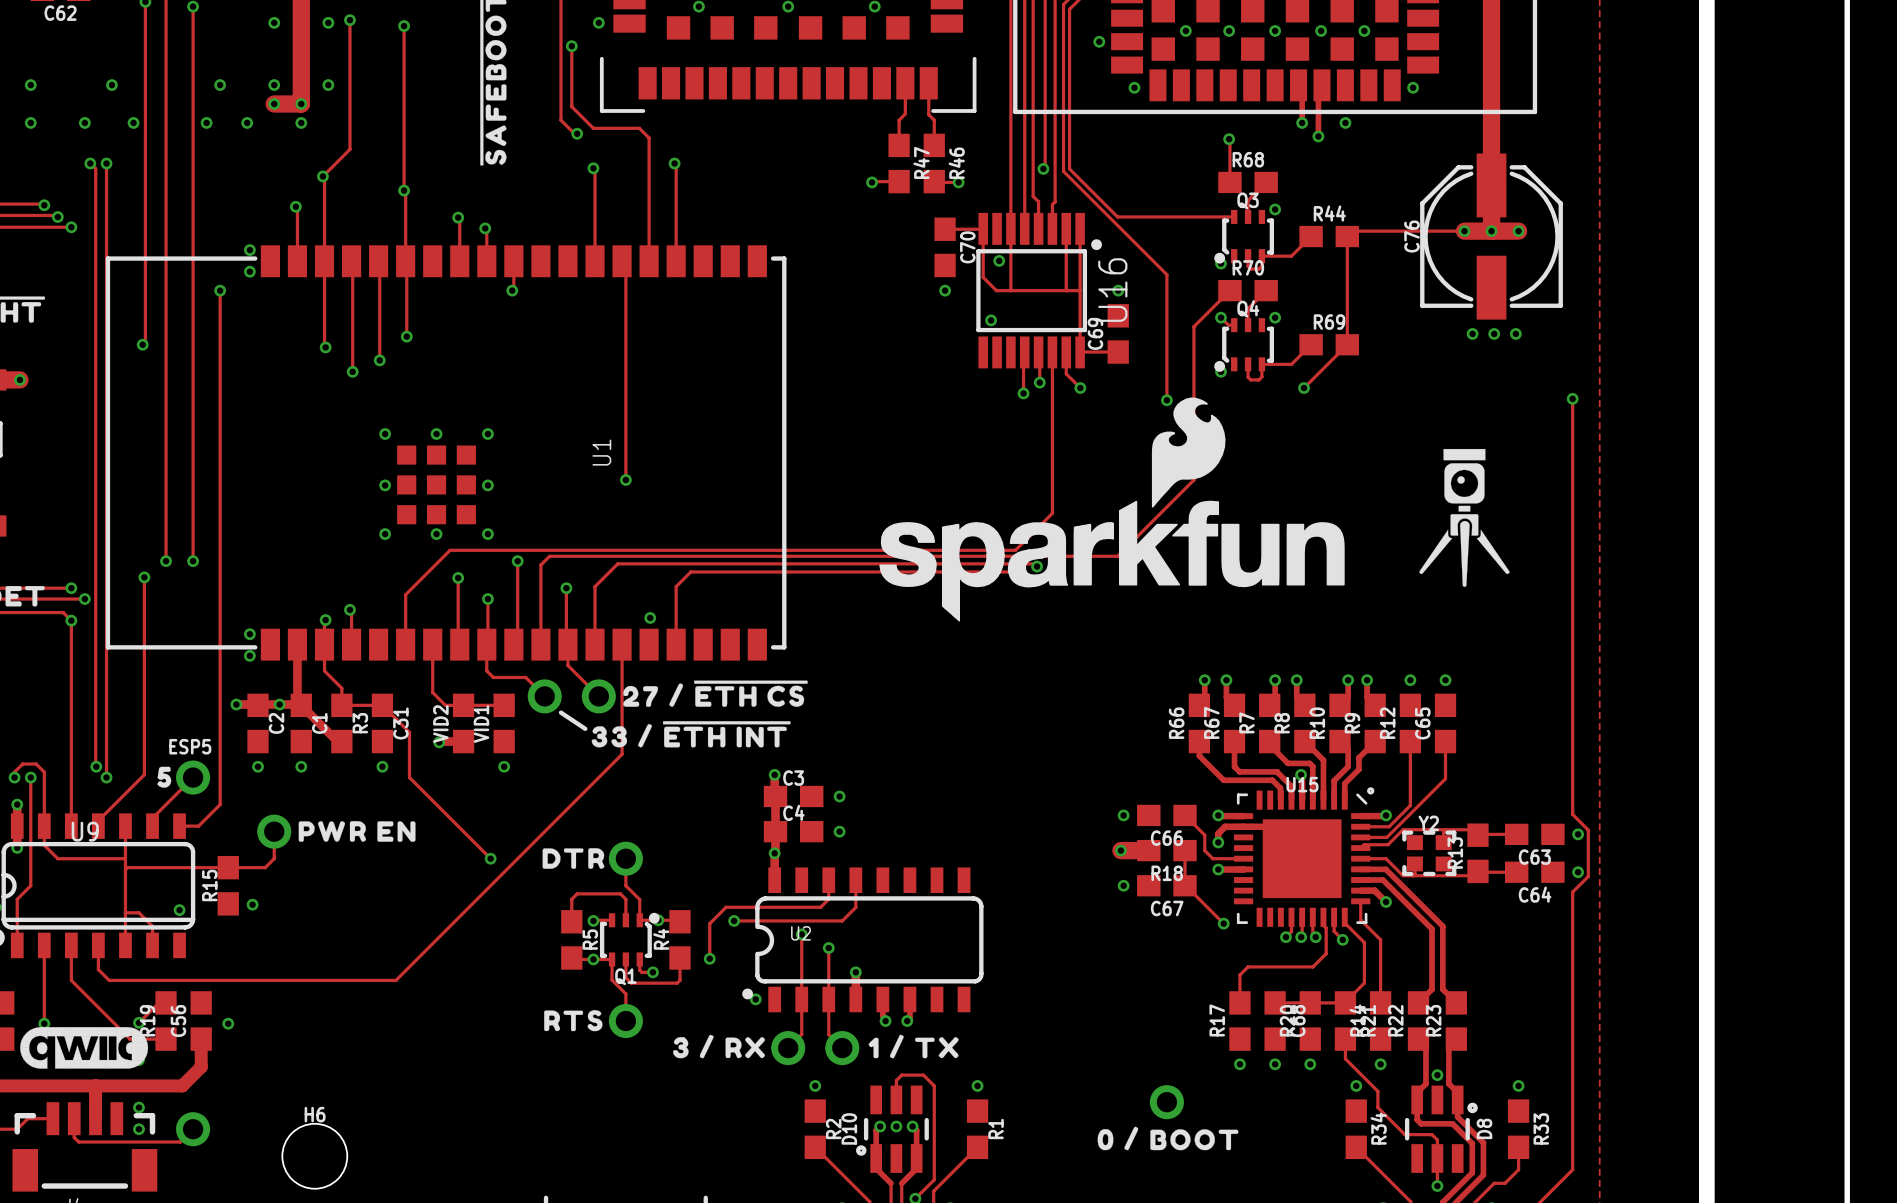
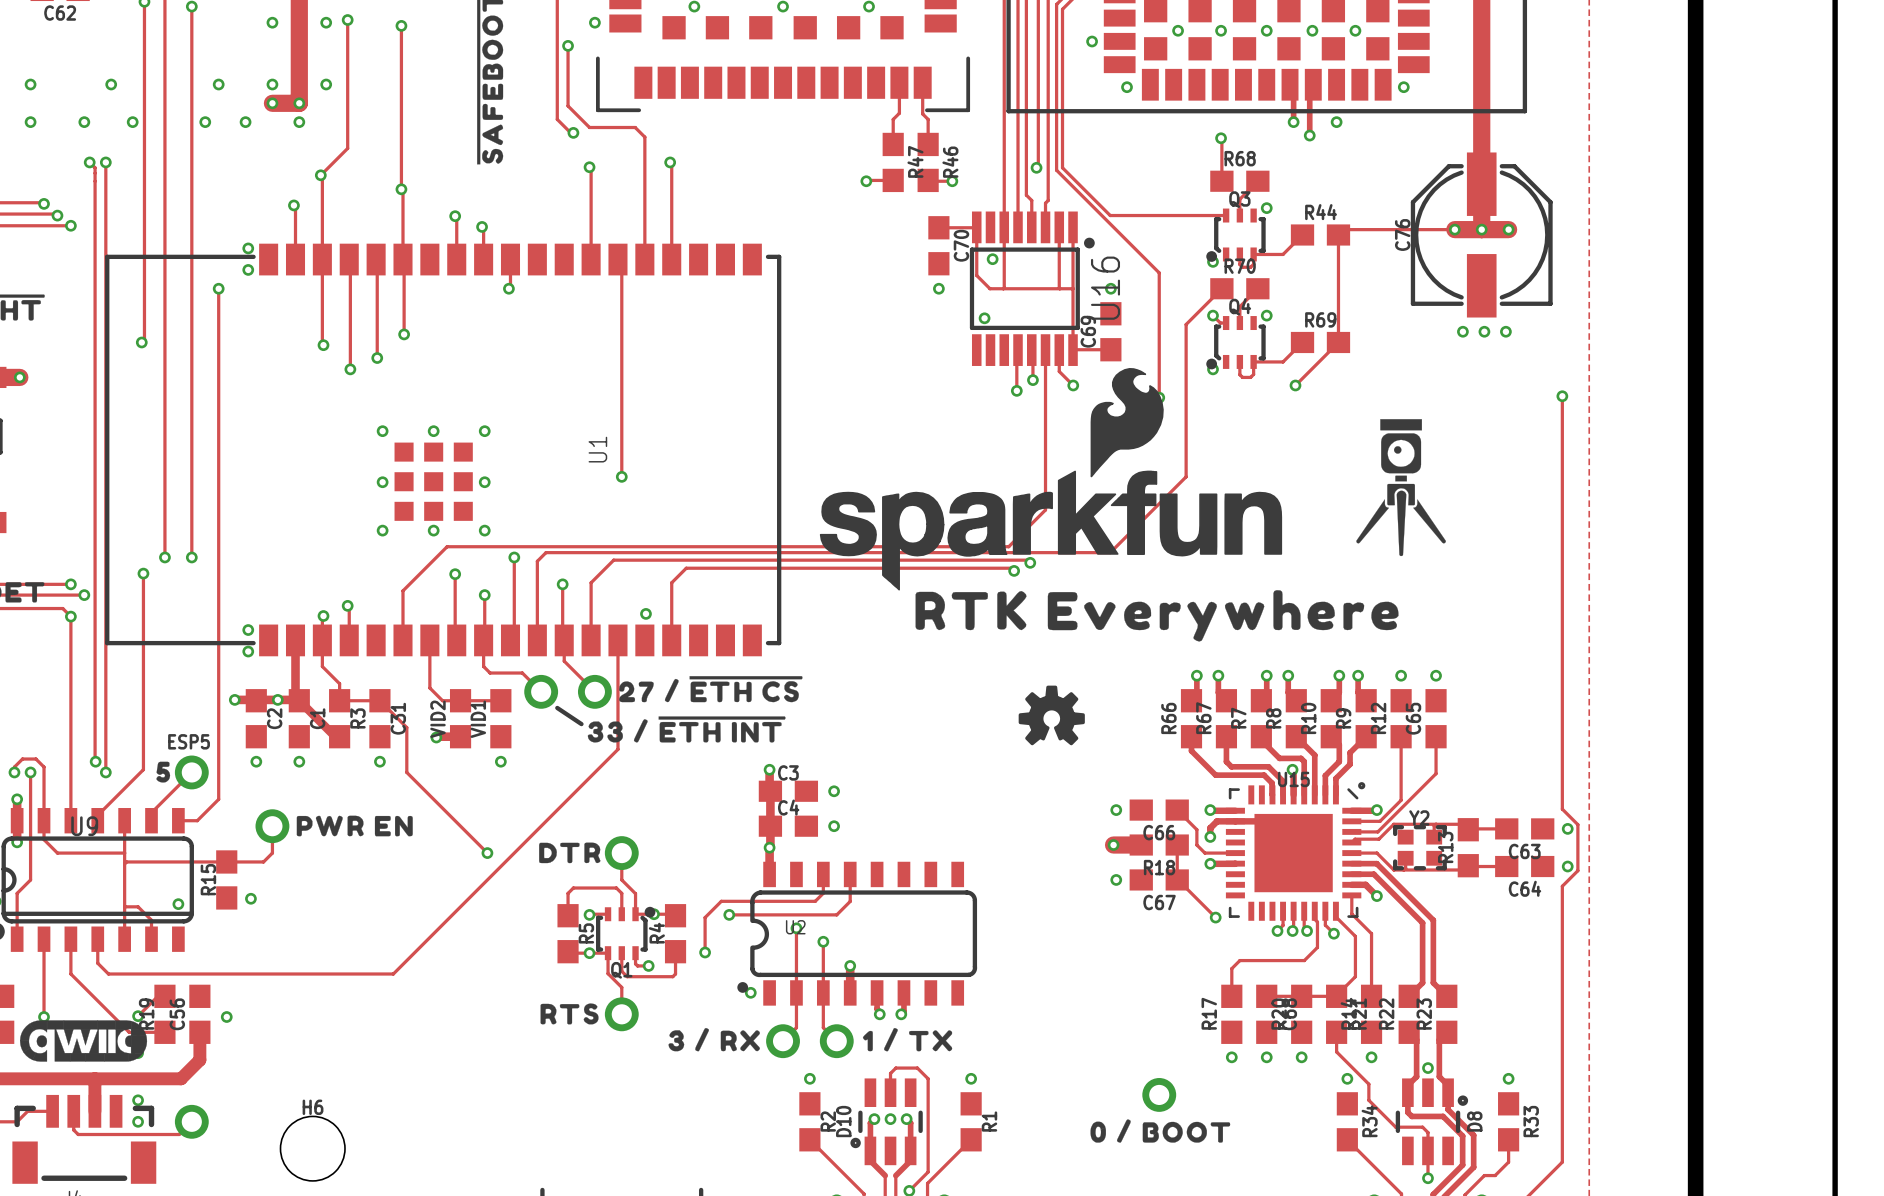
drawing position: (1188, 452) -> (1127, 422)
drawing position: (1464, 517) -> (1401, 487)
drawing position: (1112, 561) -> (1050, 530)
drawing: none -> [915, 590, 1399, 642]
drawing: none -> [1018, 685, 1085, 746]

